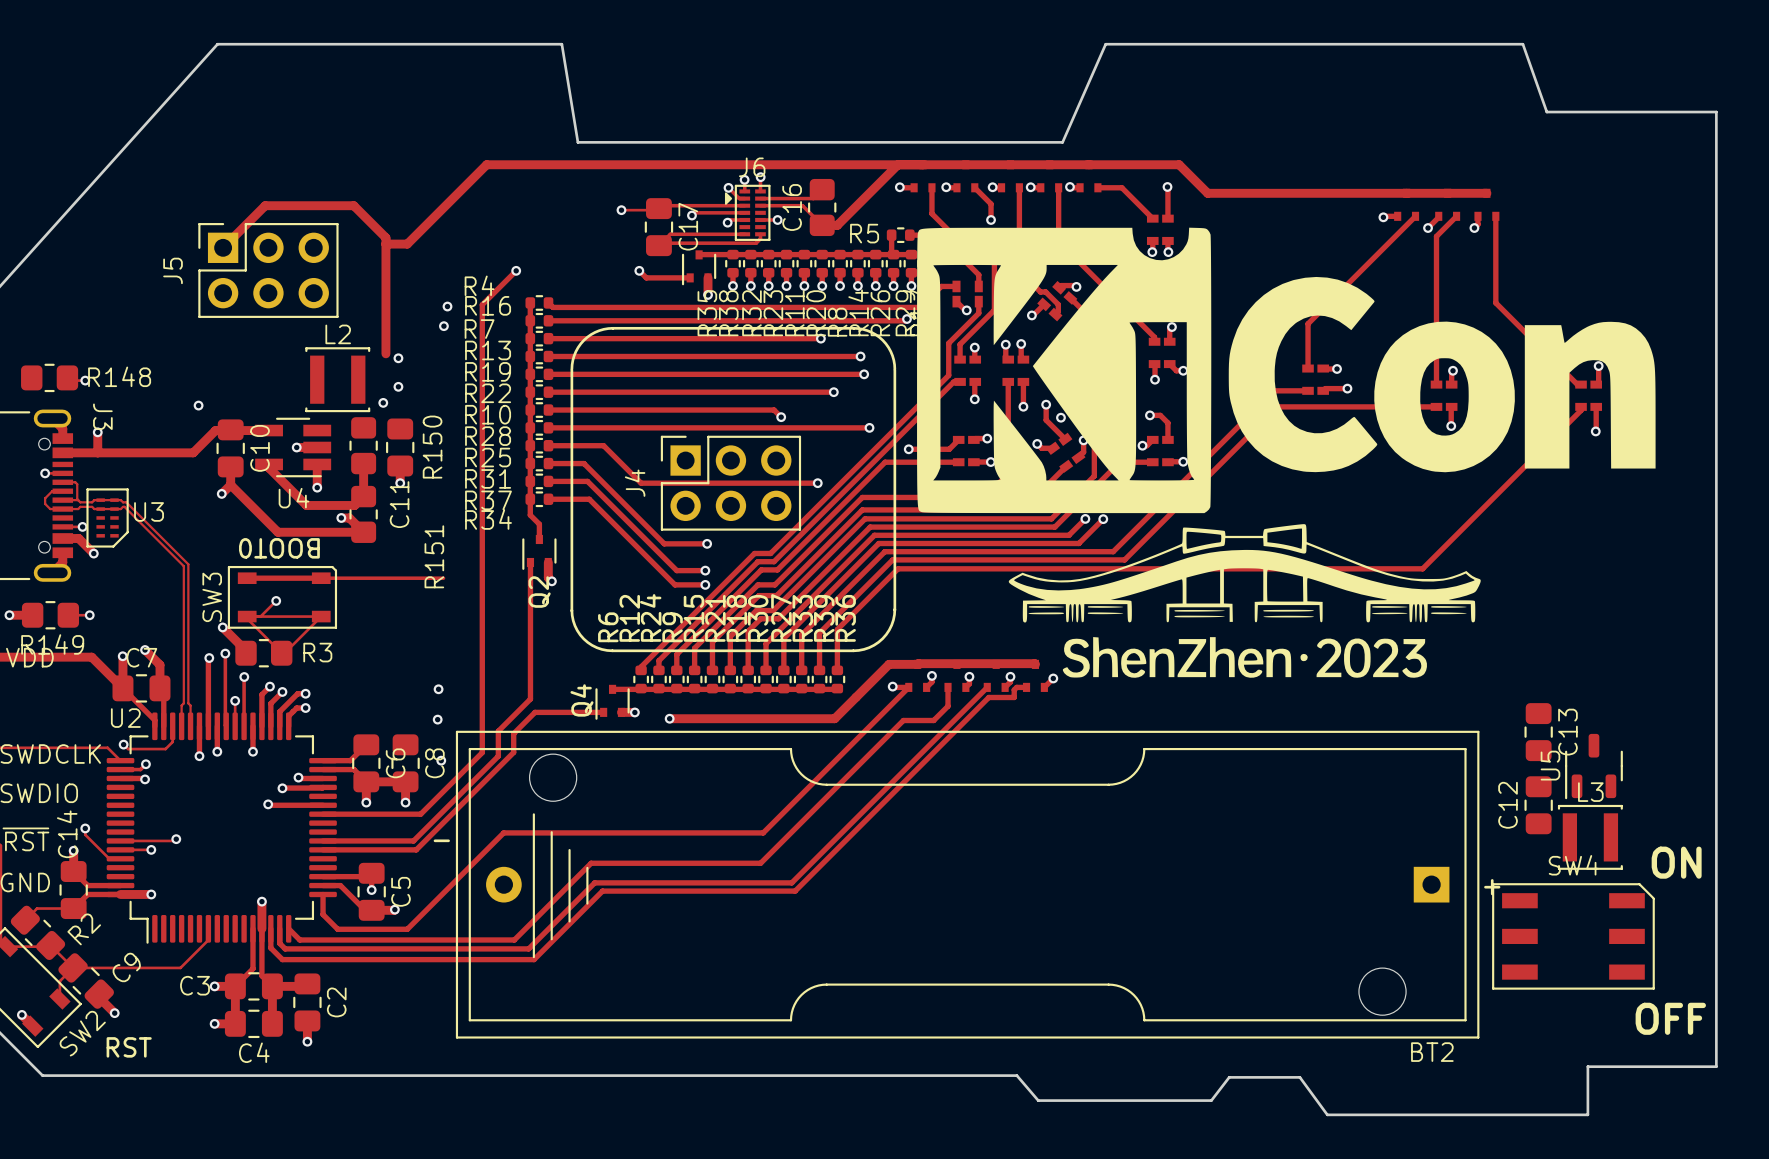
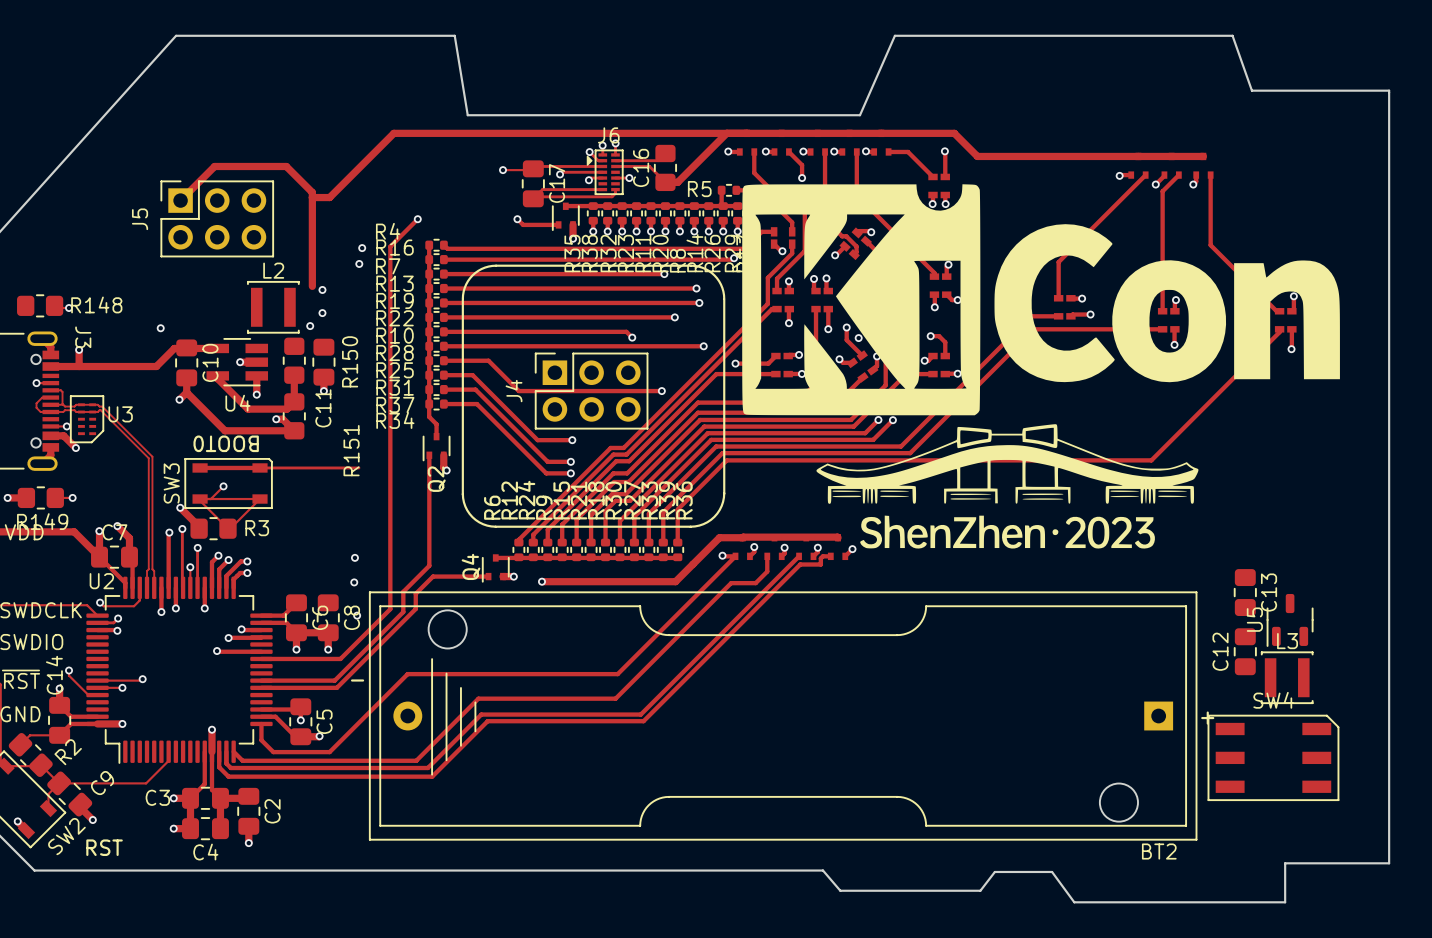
text: ON (1676, 862) -> none
text: OFF (1670, 1018) -> none

